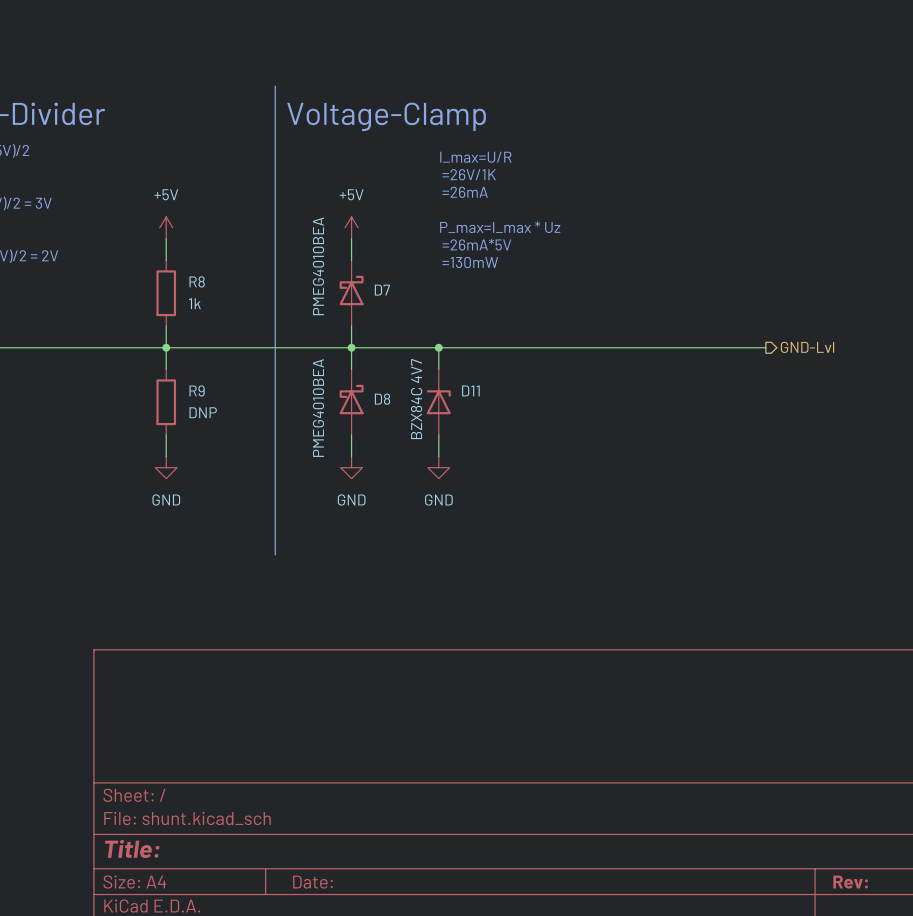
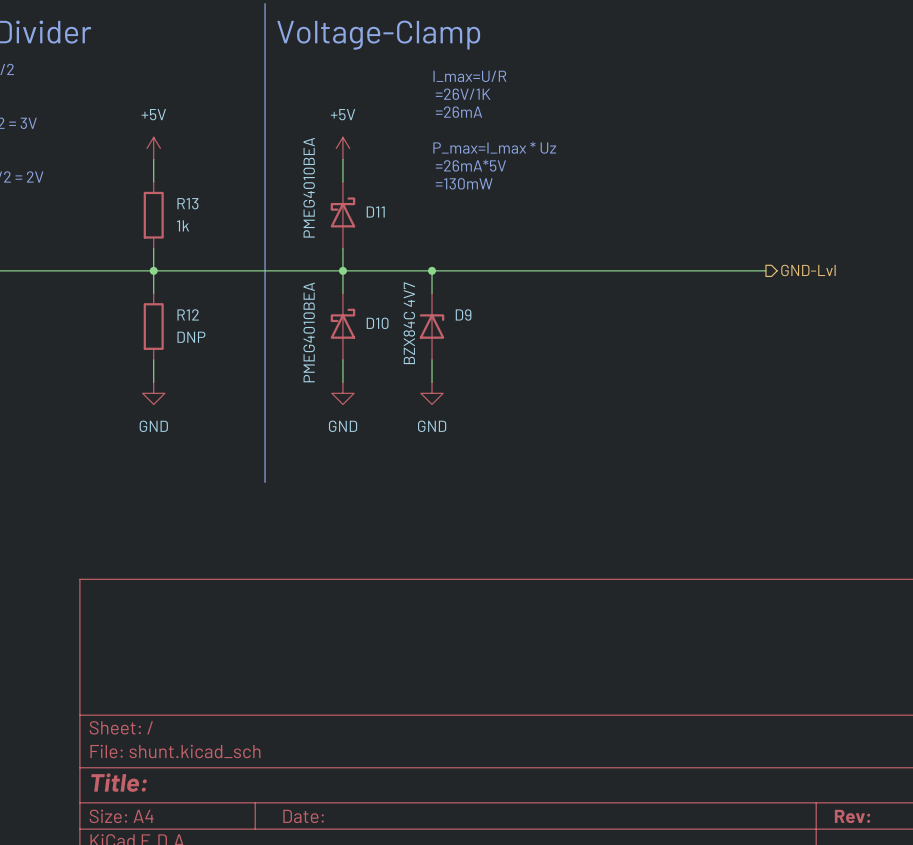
R8 name: R8 (197, 281) -> R13 (187, 203)
D7 name: D7 (382, 290) -> D11 (375, 212)
R9 name: R9 (197, 390) -> R12 (188, 314)
D11 name: D11 (470, 390) -> D9 (463, 314)
D8 name: D8 (382, 399) -> D10 (377, 323)

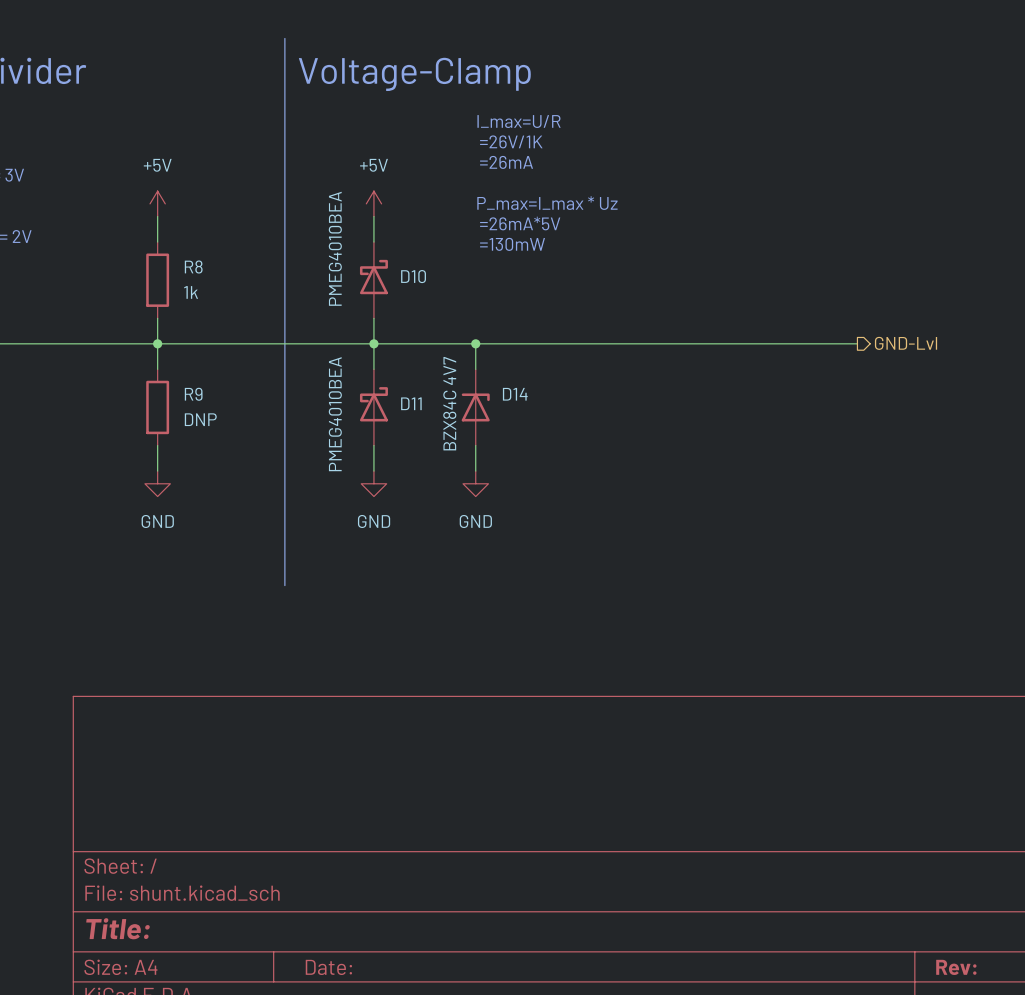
R13 name: R13 (187, 203) -> R8 (193, 267)
D11 name: D11 (375, 212) -> D10 (413, 276)
R12 name: R12 (188, 314) -> R9 (193, 394)
D9 name: D9 (463, 314) -> D14 (515, 394)
D10 name: D10 (377, 323) -> D11 (411, 403)

